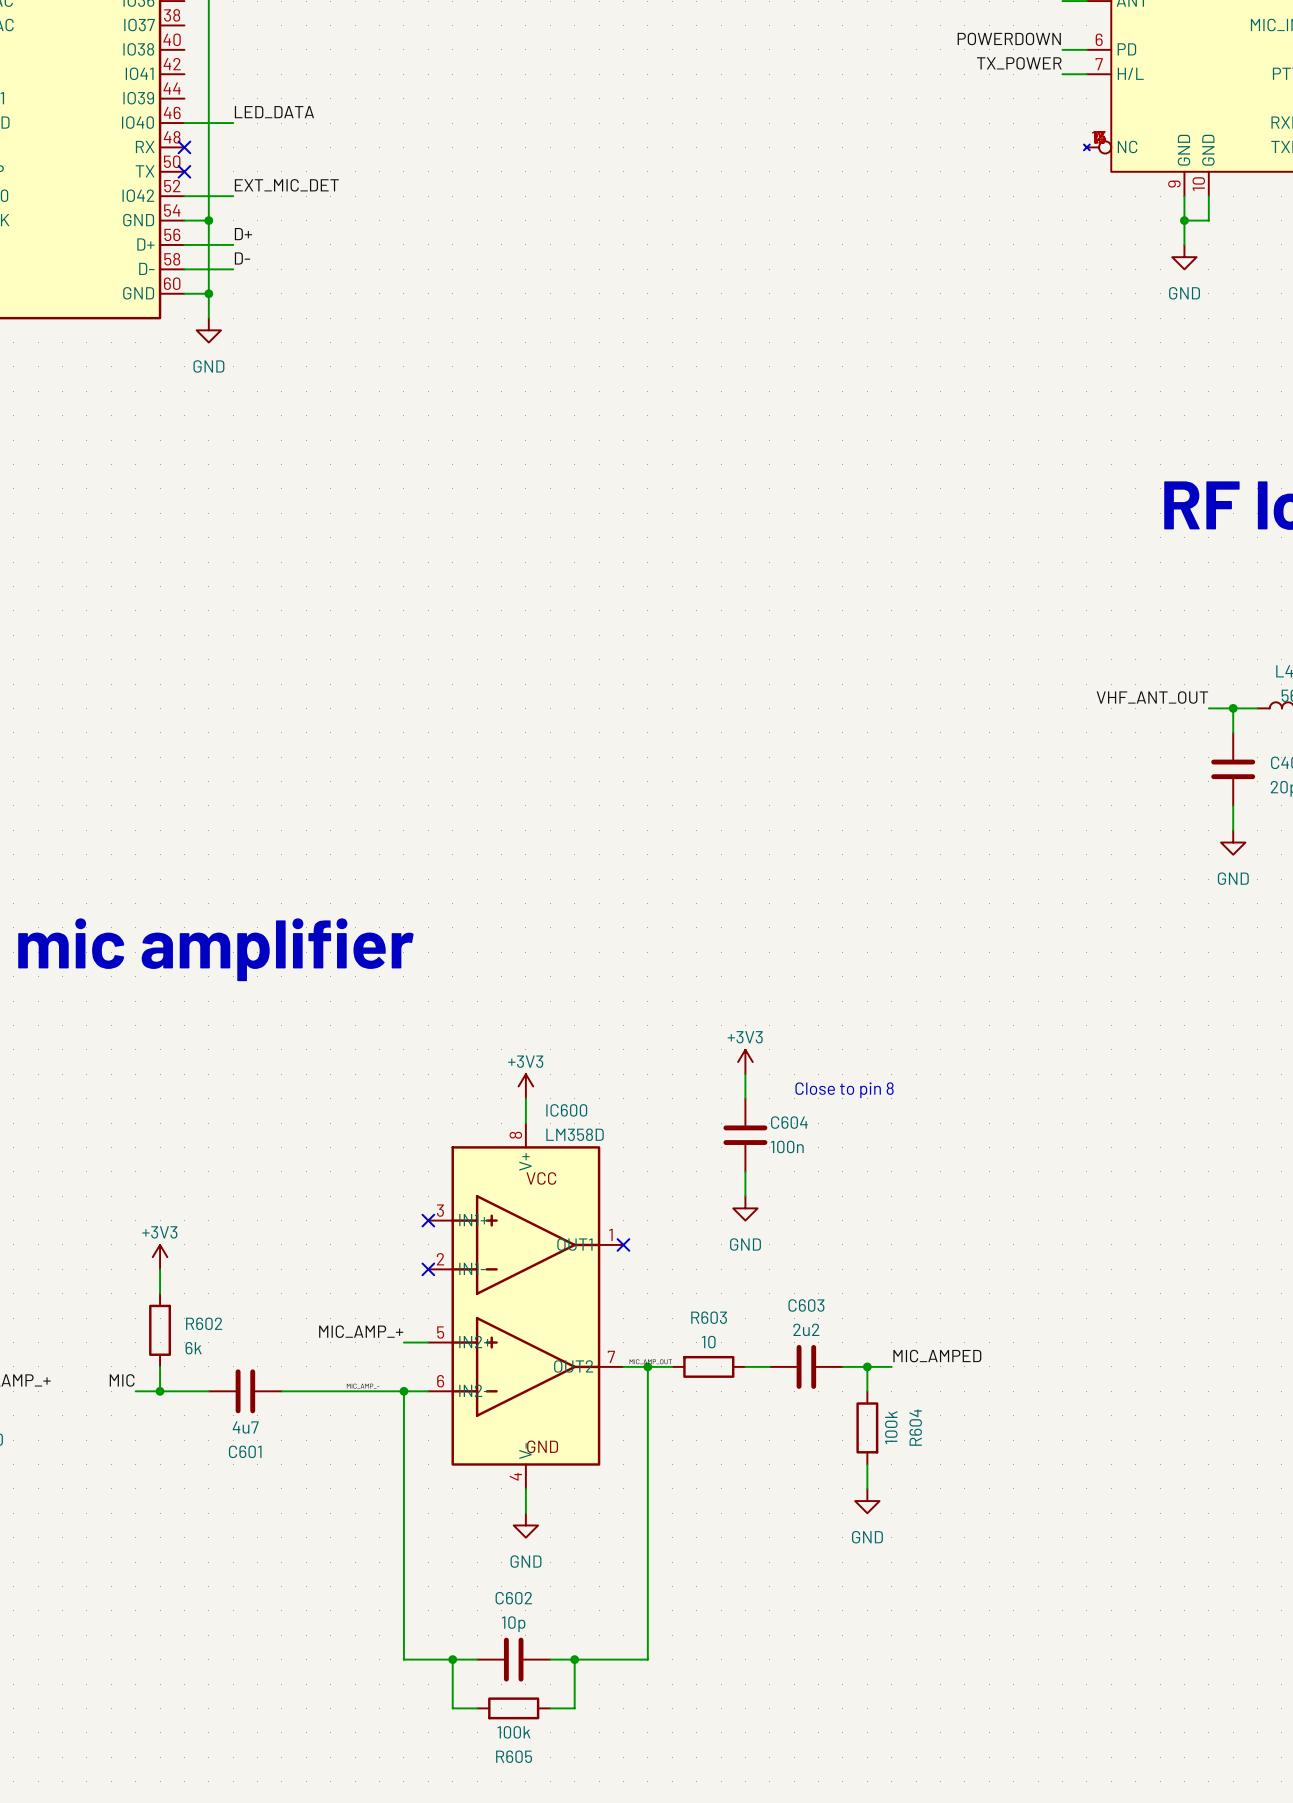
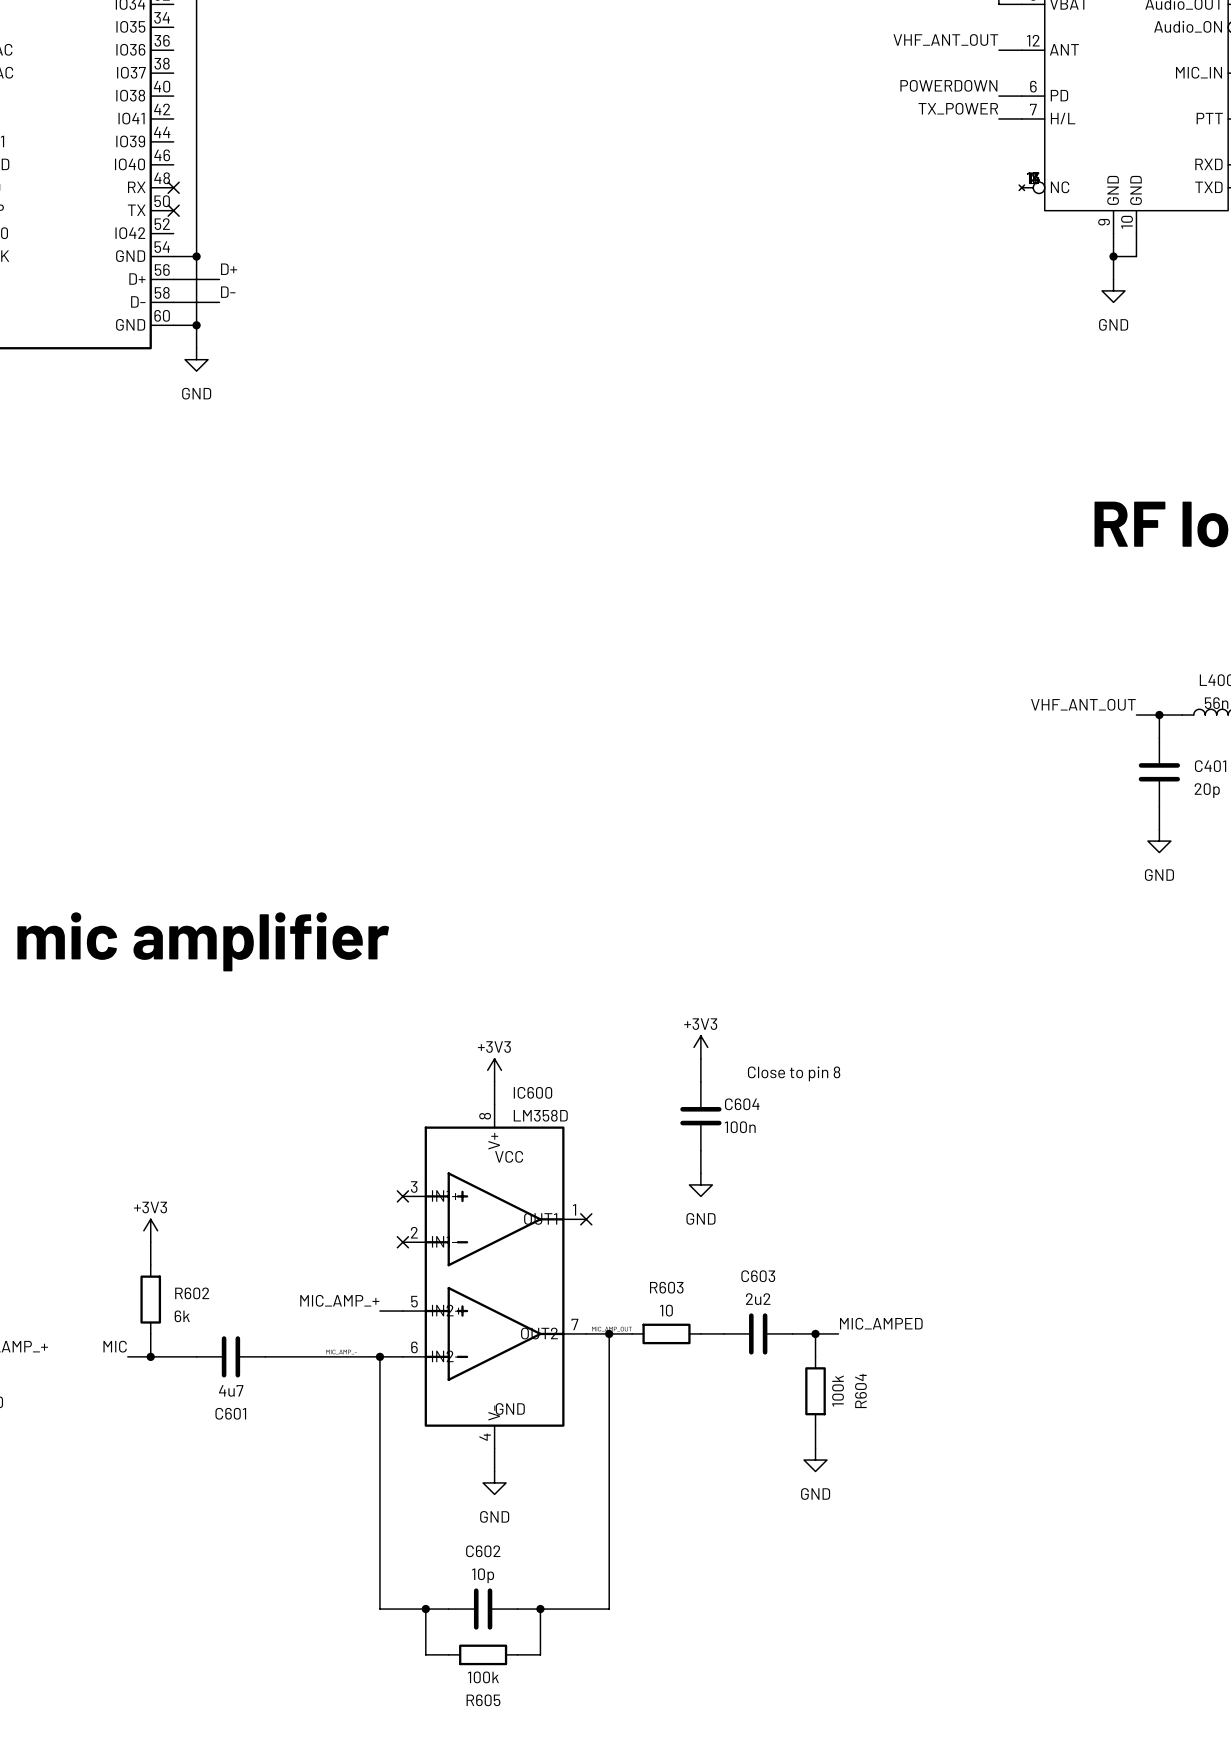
label: LED_DATA (274, 112) -> none
wire: (184, 123) (233, 123) -> none
label: EXT_MIC_DET (286, 185) -> none
wire: (184, 196) (233, 196) -> none

